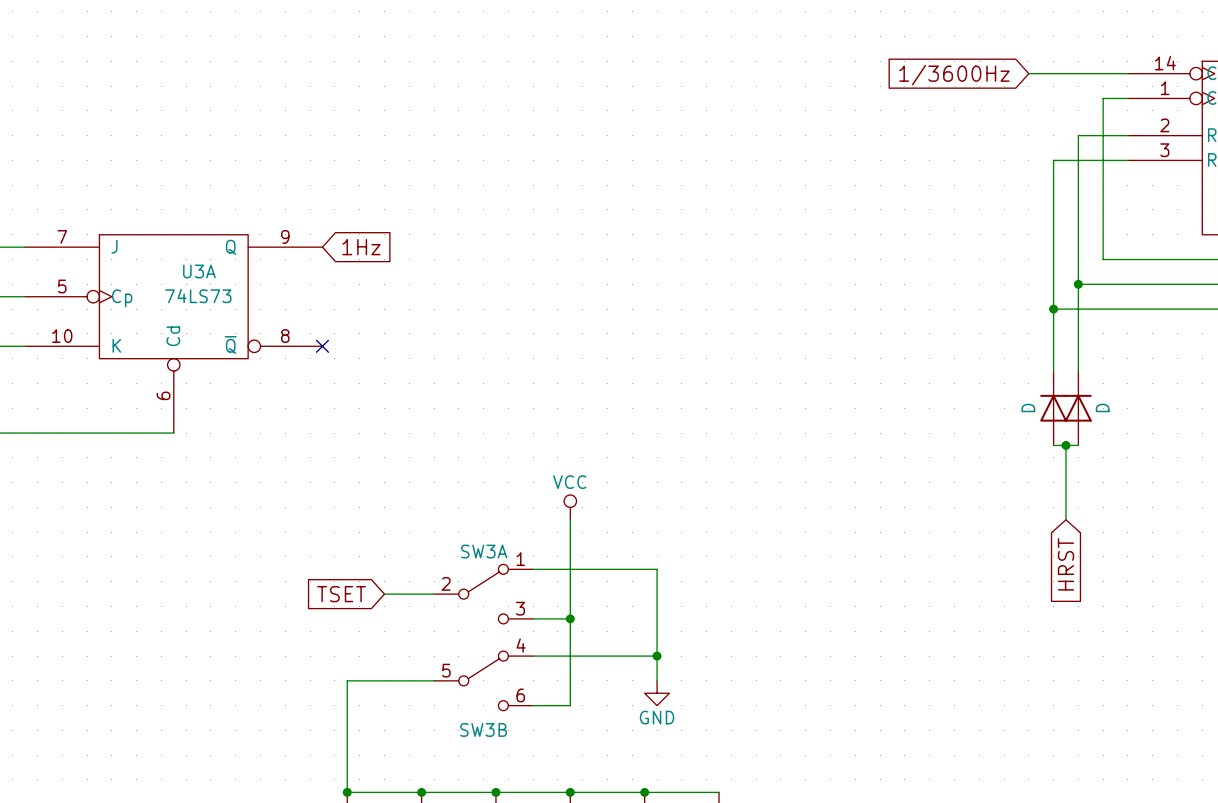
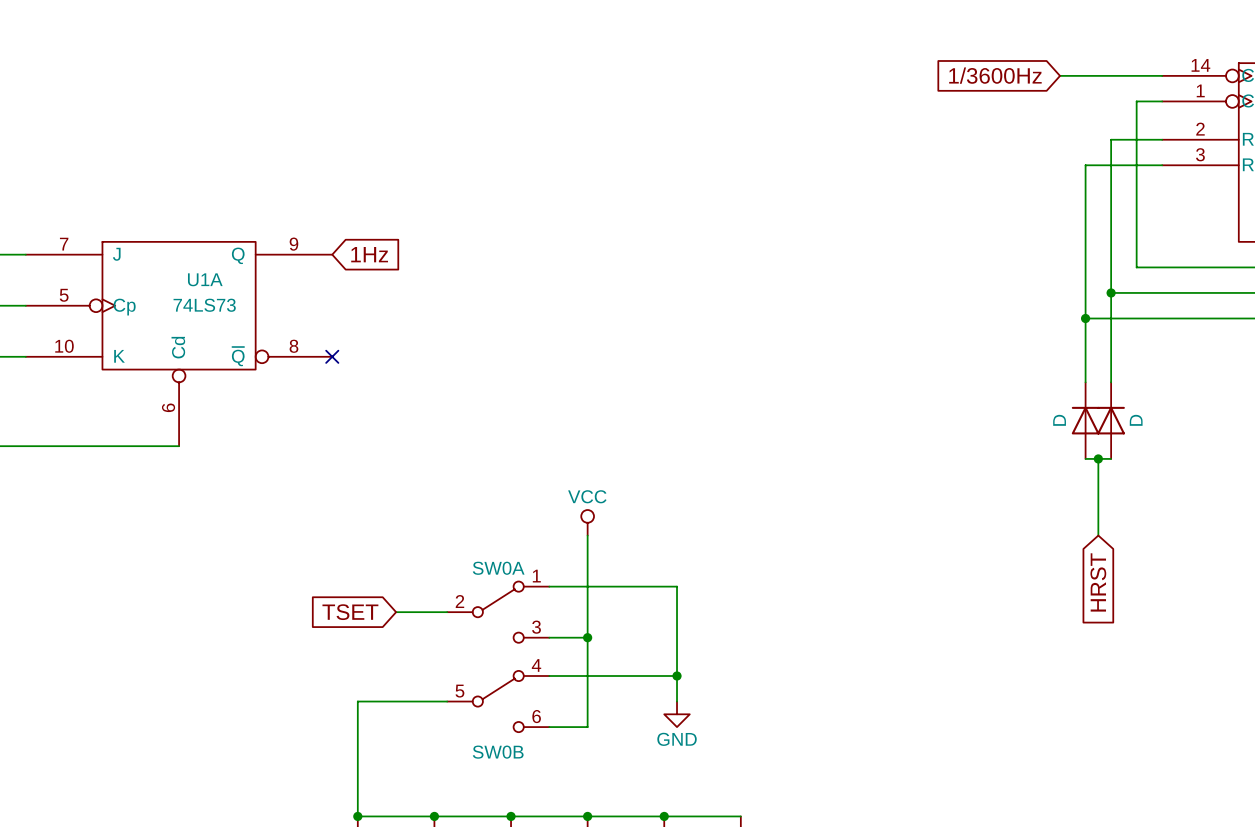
U3A name: U3A (199, 271) -> U1A (205, 279)
SW3A name: SW3A (484, 551) -> SW0A (498, 568)
SW3B name: SW3B (483, 729) -> SW0B (498, 752)

